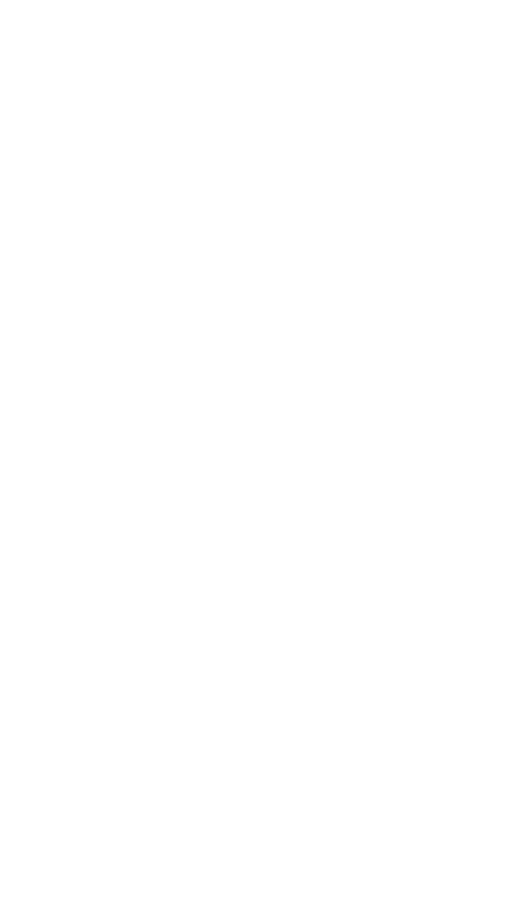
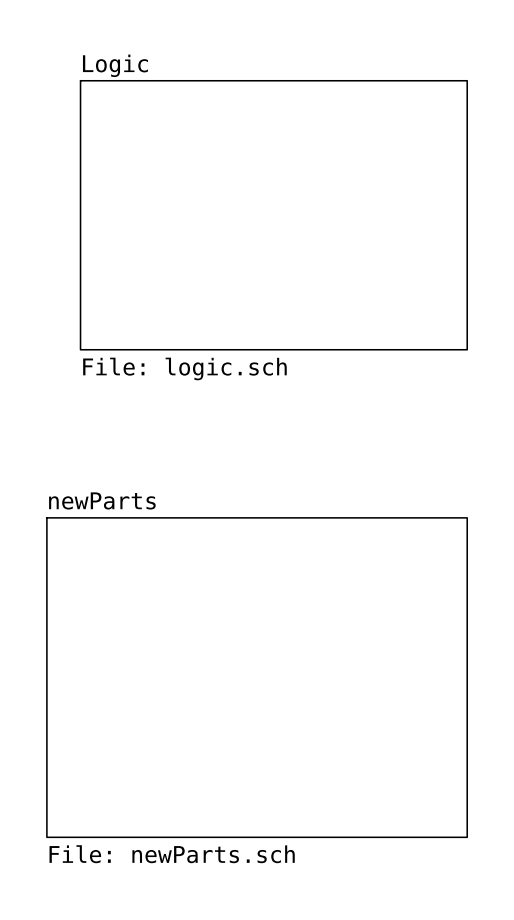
sheet Logic: none -> File: logic.sch (273, 215)
sheet newParts: none -> File: newParts.sch (257, 677)

